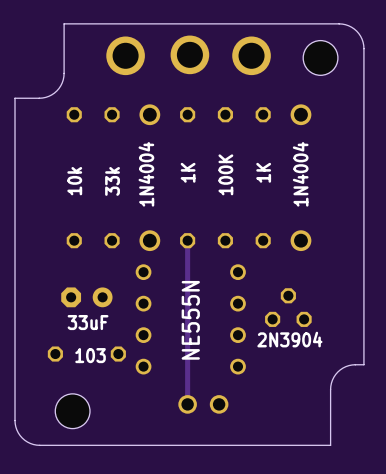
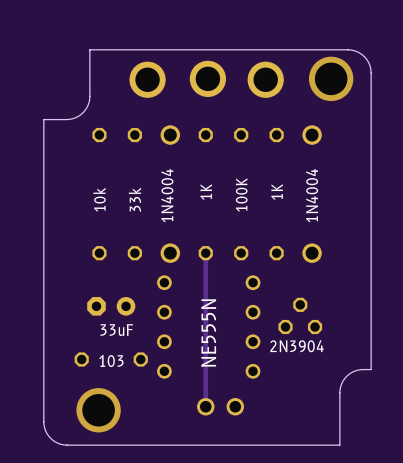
via: none -> (331, 78)
hole: (320, 57) -> none
via: none -> (98, 410)
hole: (72, 411) -> none

